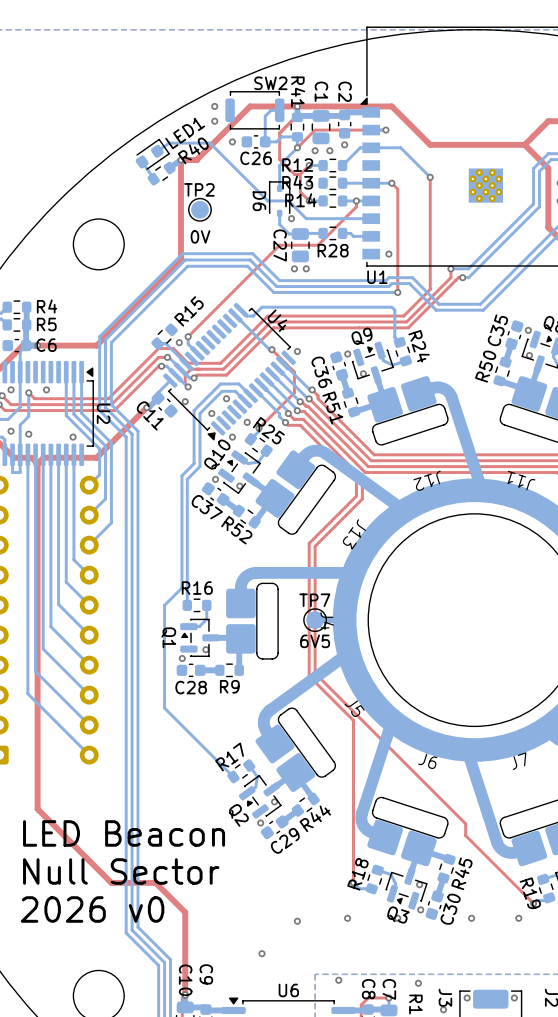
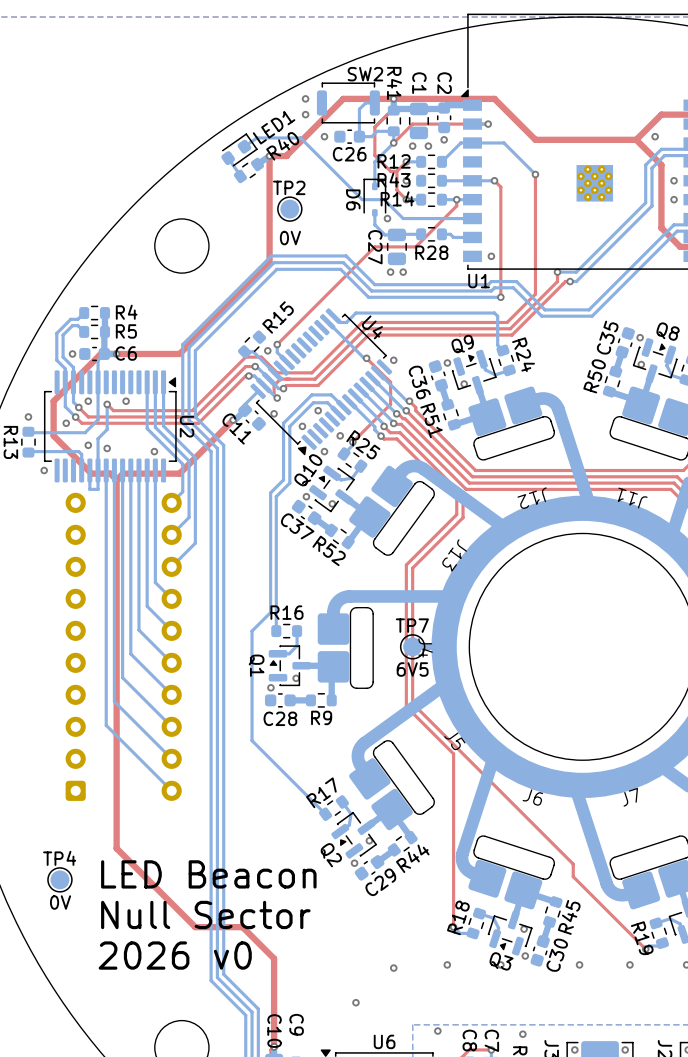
via: none -> (655, 136)

